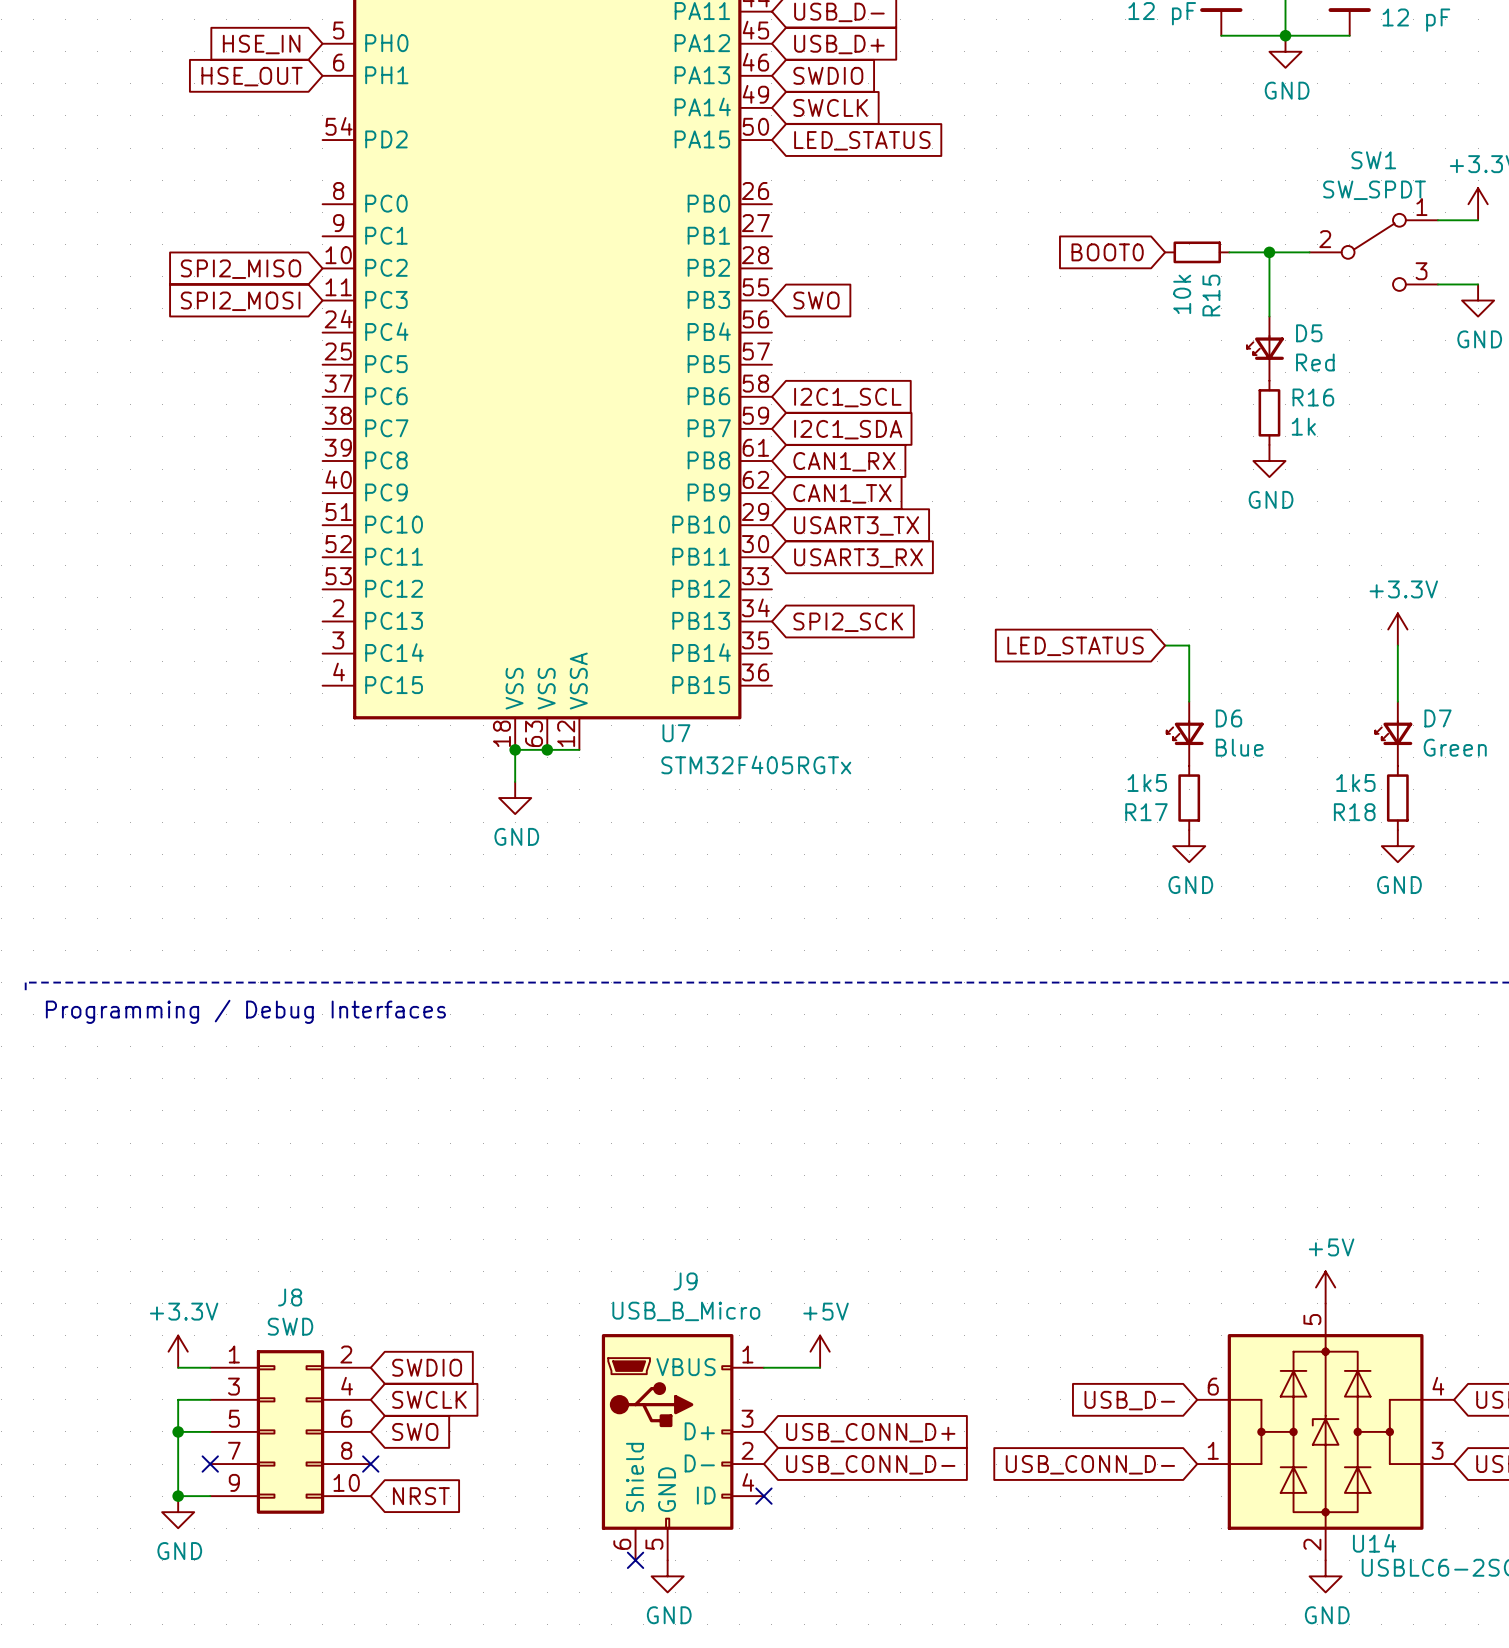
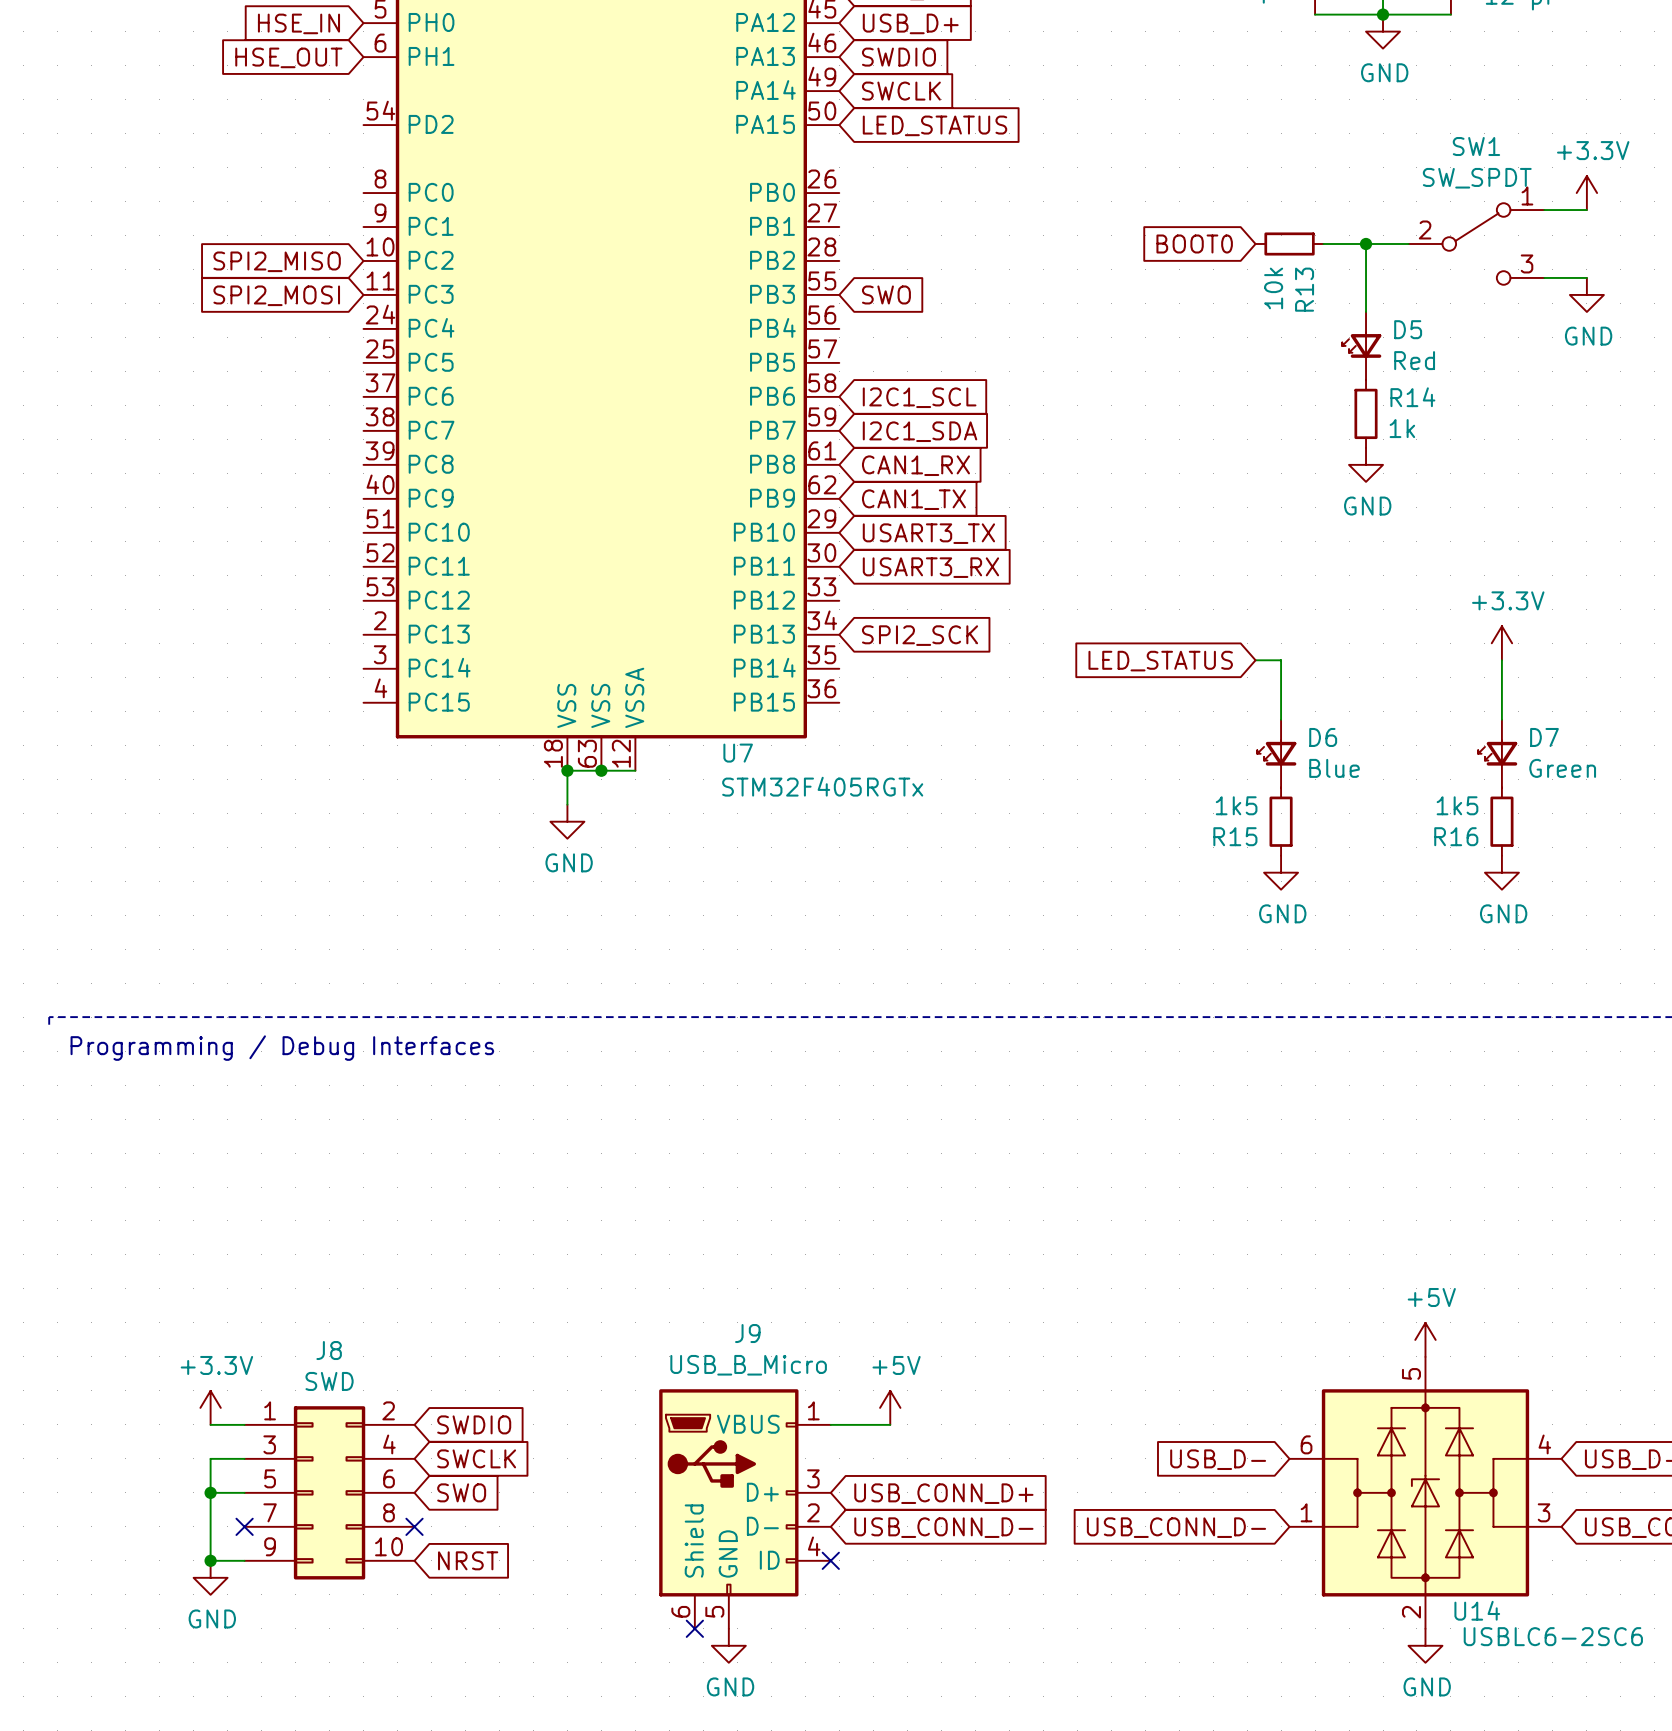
R15 name: R15 (1211, 295) -> R13 (1304, 289)
R16 name: R16 (1313, 397) -> R14 (1412, 397)
R17 name: R17 (1146, 812) -> R15 (1235, 836)
R18 name: R18 (1354, 812) -> R16 (1456, 836)

